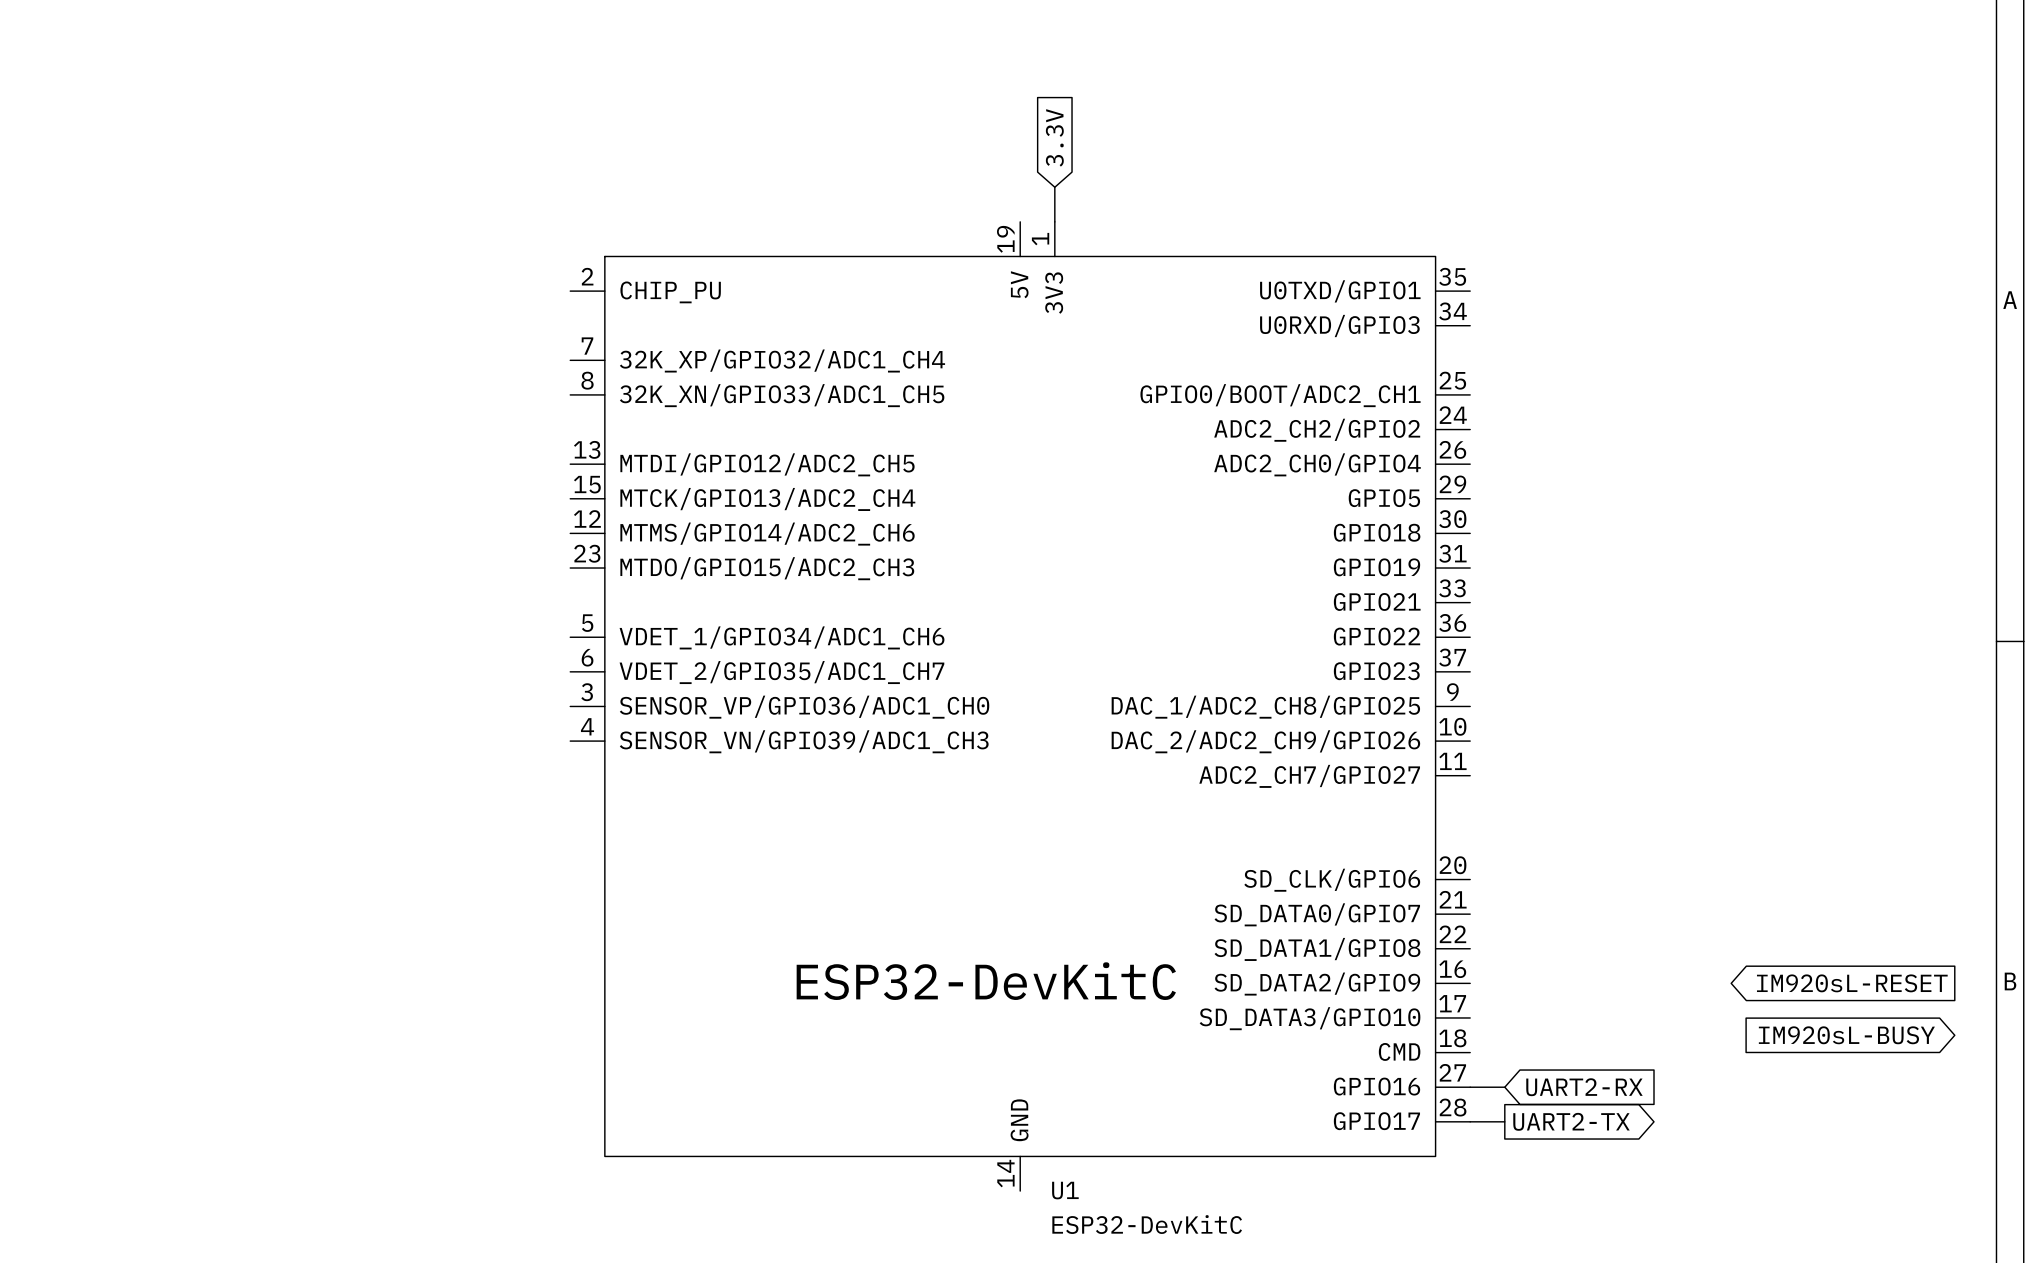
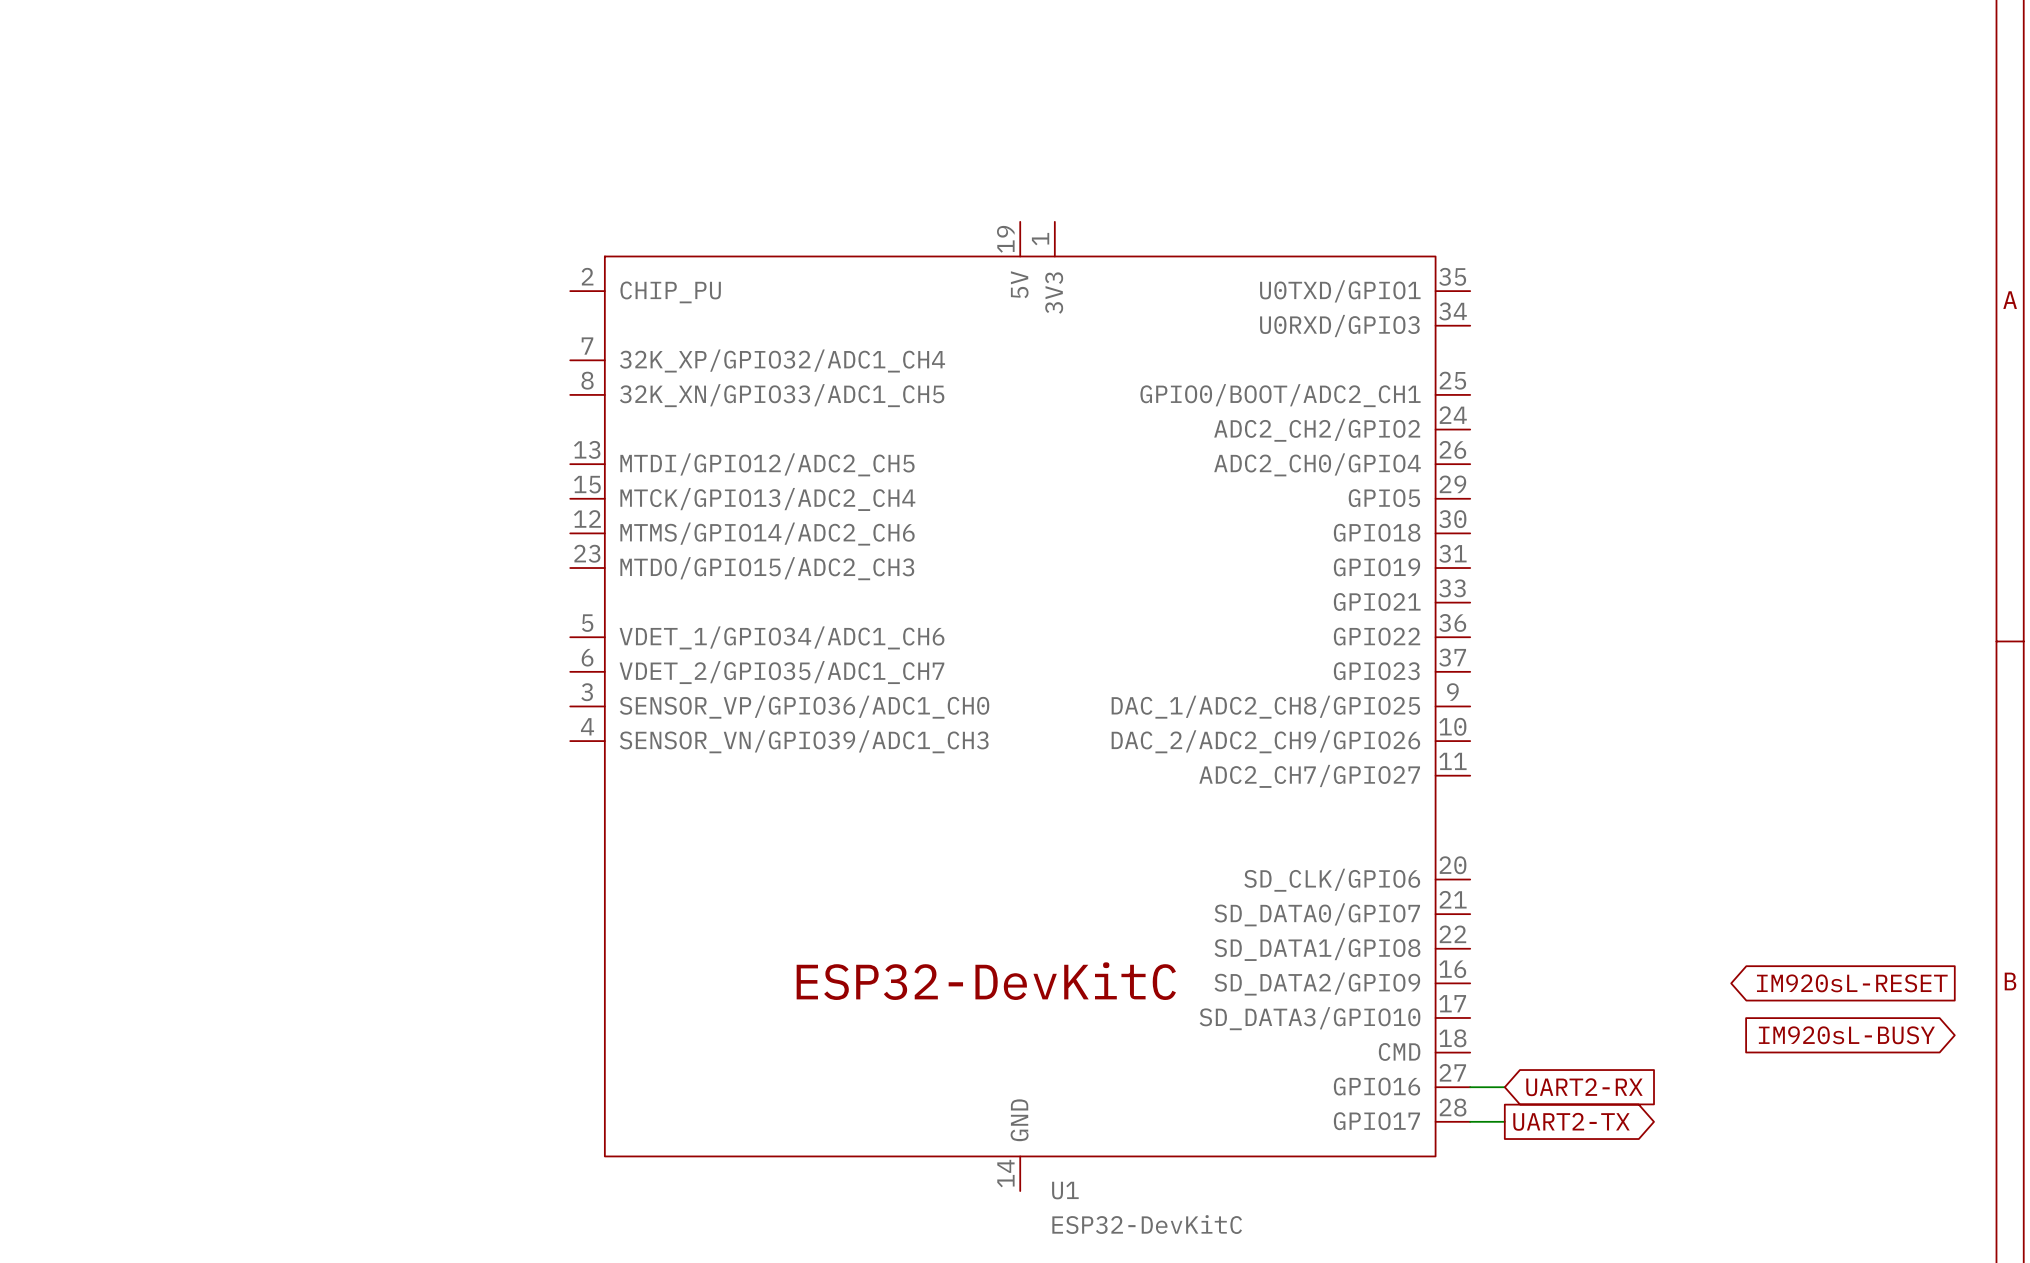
global label: 3.3V (1054, 137) -> none
wire: (1054, 187) (1054, 221) -> none

